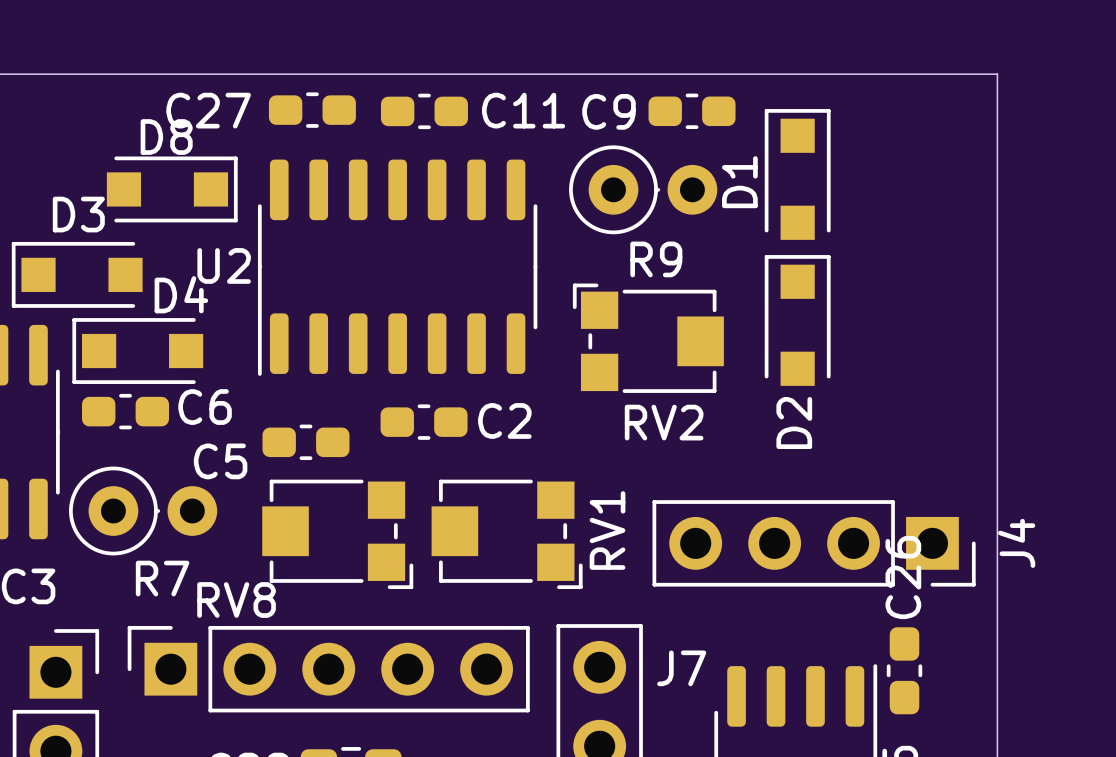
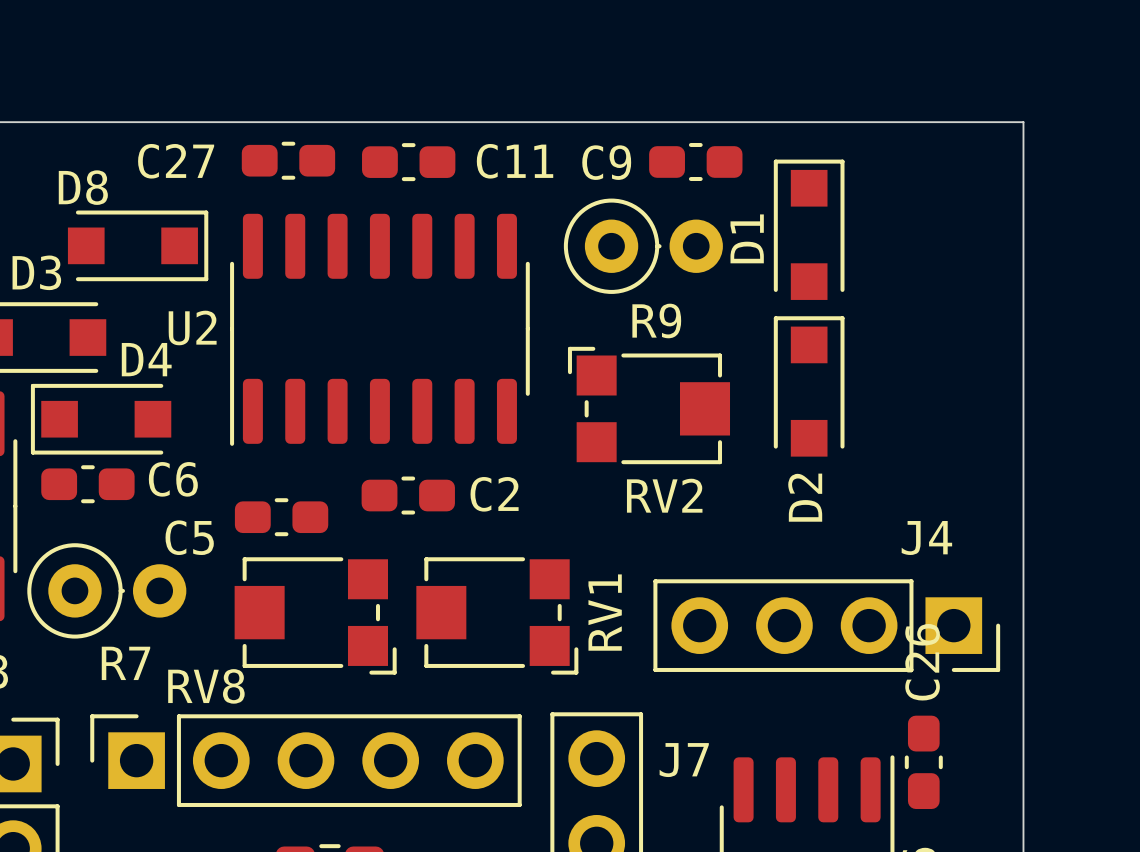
D8 name position: D8 (166, 137) -> D8 (83, 187)
J4 name rotation: 0° (1016, 543) -> 90° clockwise (926, 538)
J4 name position: J4 (1016, 543) -> J4 (926, 538)

